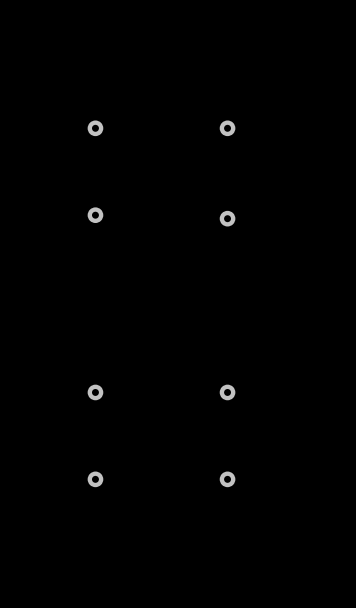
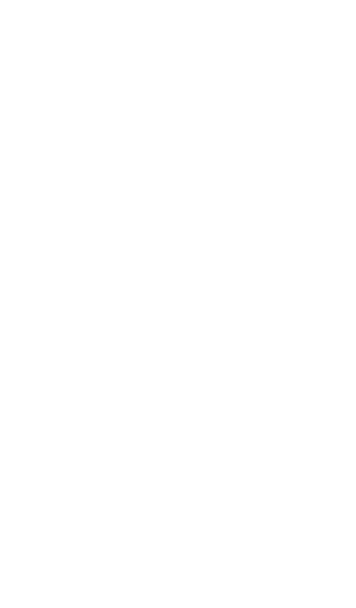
via: (95, 128) -> none
via: (227, 128) -> none
via: (95, 215) -> none
via: (227, 218) -> none
via: (95, 392) -> none
via: (227, 392) -> none
via: (95, 479) -> none
via: (227, 479) -> none

